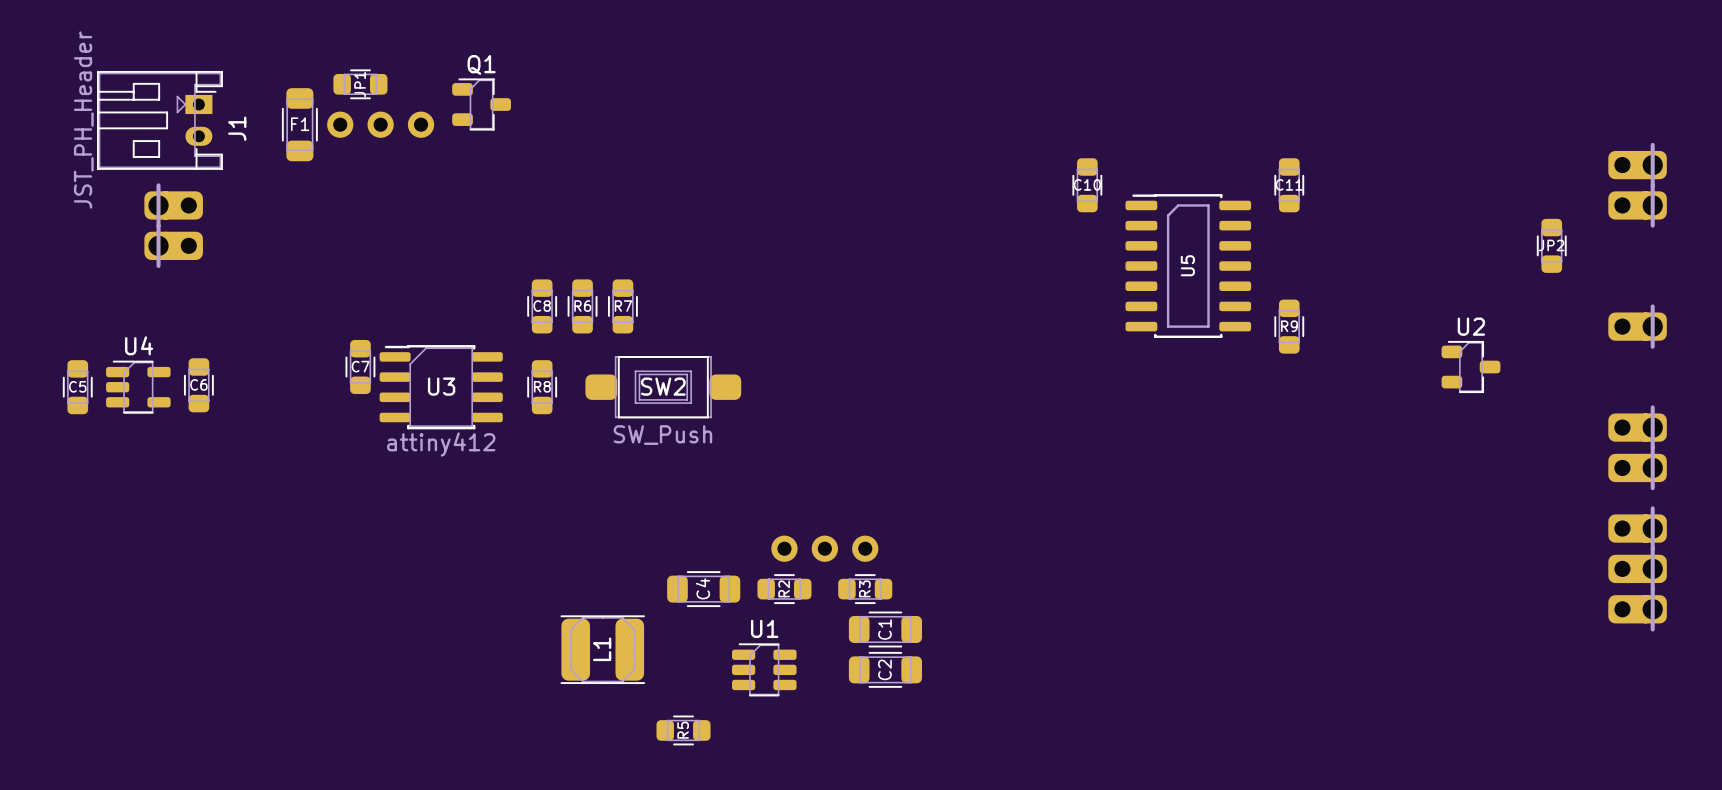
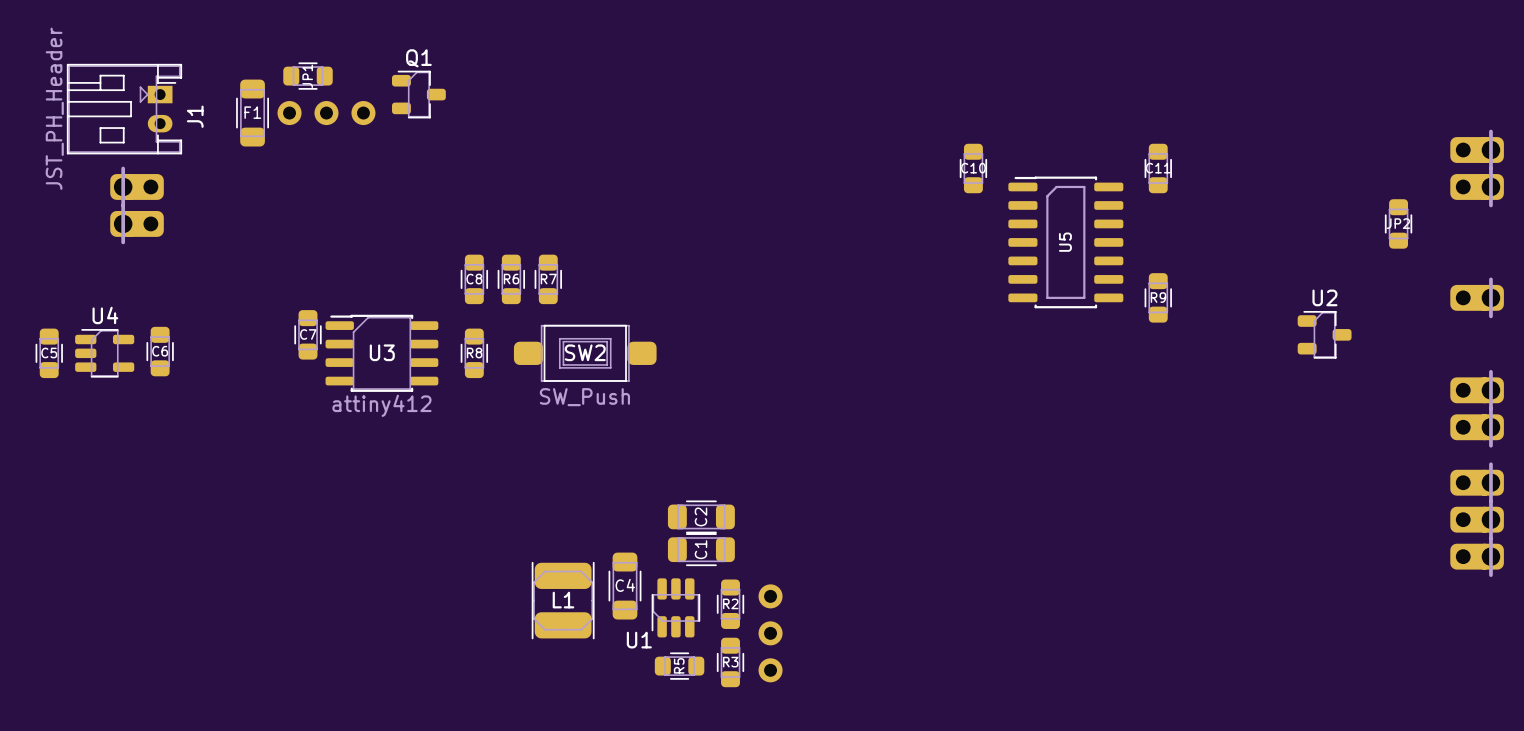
part rotation: 0° (824, 548) -> 90° clockwise (770, 633)
part position: (824, 548) -> (770, 633)
C4 rotation: 0° (703, 589) -> 90° clockwise (624, 586)
C4 position: (703, 589) -> (624, 586)
R2 rotation: 0° (784, 589) -> 90° clockwise (730, 604)
R2 position: (784, 589) -> (730, 604)
R3 rotation: 0° (865, 589) -> 90° clockwise (730, 662)
R3 position: (865, 589) -> (730, 662)
U1 name position: U1 (764, 628) -> U1 (639, 640)
C1 position: (885, 629) -> (701, 549)
L1 rotation: 0° (602, 649) -> 90° clockwise (563, 600)
U1 rotation: 0° (764, 669) -> 90° counterclockwise (675, 607)
C2 position: (885, 669) -> (701, 516)
R5 position: (683, 730) -> (679, 666)

